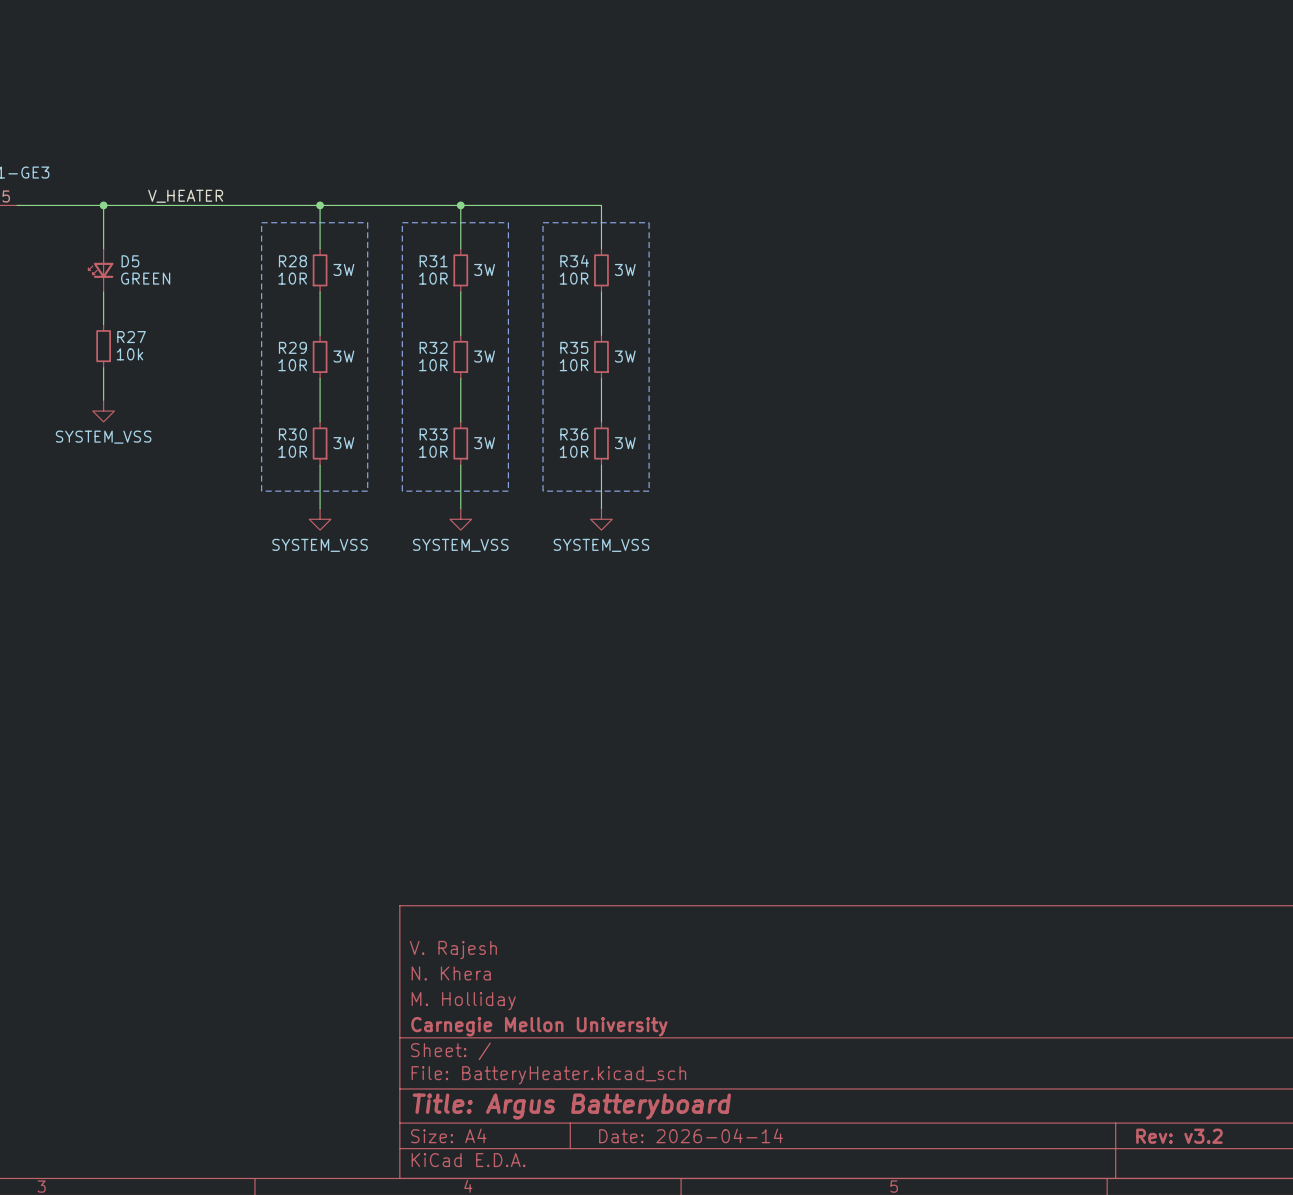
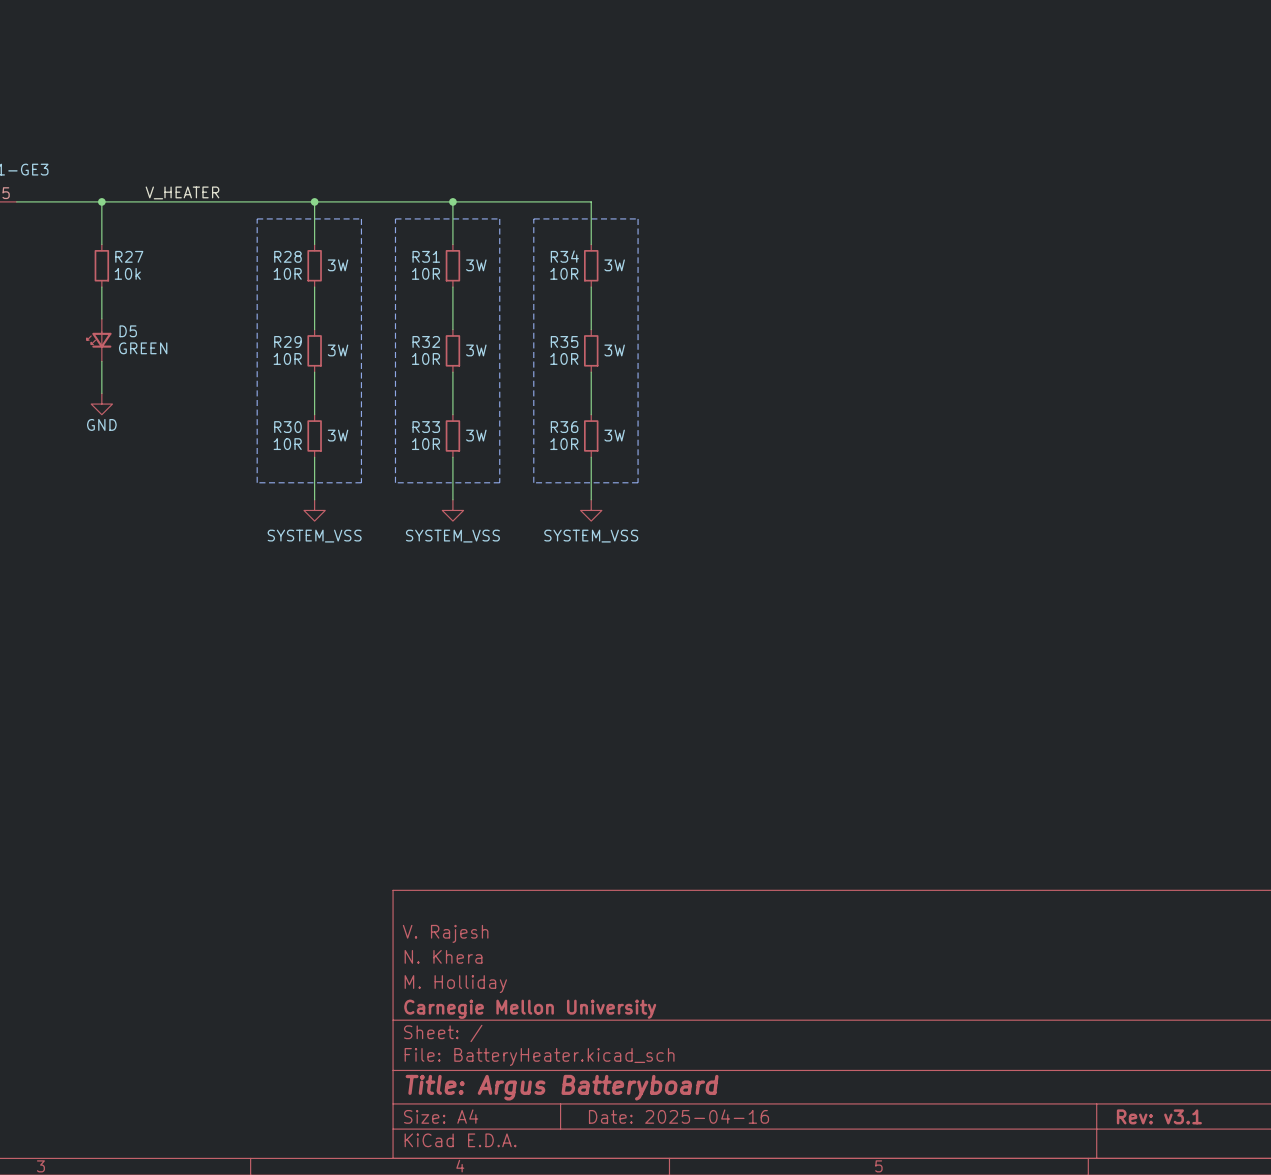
D5 position: (100, 270) -> (99, 340)
R27 position: (103, 346) -> (101, 265)
power symbol: SYSTEM_VSS (103, 411) -> GND (101, 404)
title block: Date: 2026-04-14 (691, 1135) -> Date: 2025-04-16 (678, 1116)
title block: Rev: v3.2 (1179, 1136) -> Rev: v3.1 (1159, 1116)

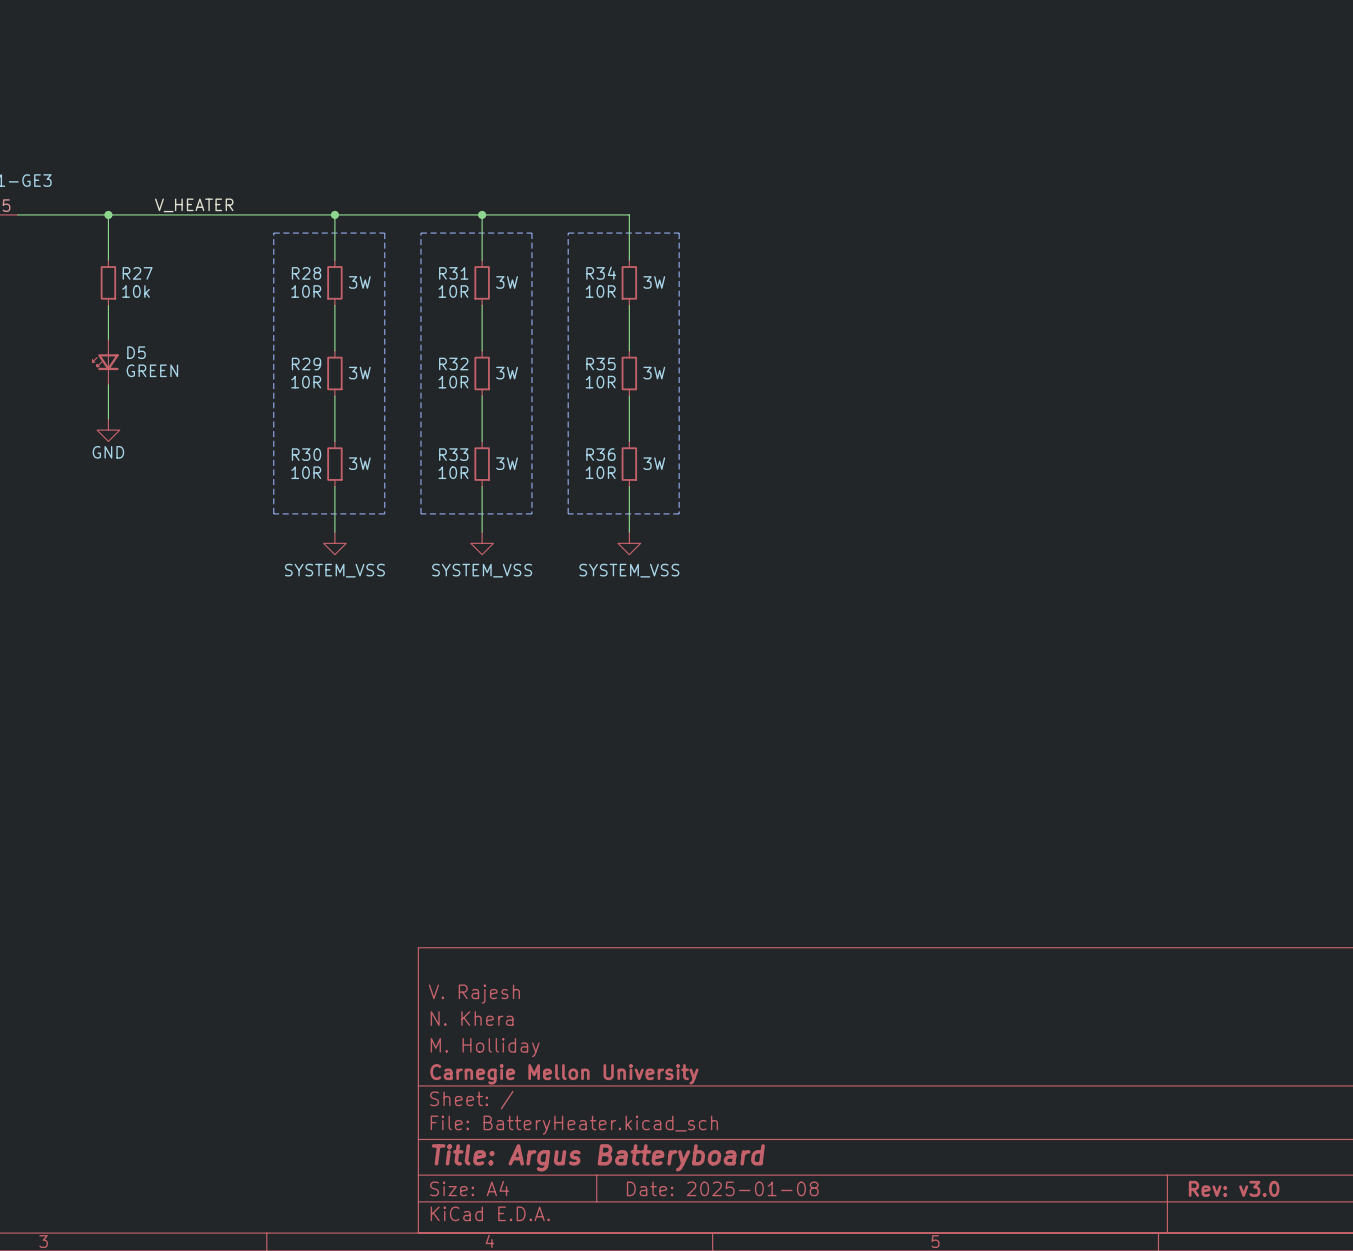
title block: Date: 2025-04-16 (678, 1116) -> Date: 2025-01-08 (722, 1188)
title block: Rev: v3.1 (1159, 1116) -> Rev: v3.0 (1234, 1188)

